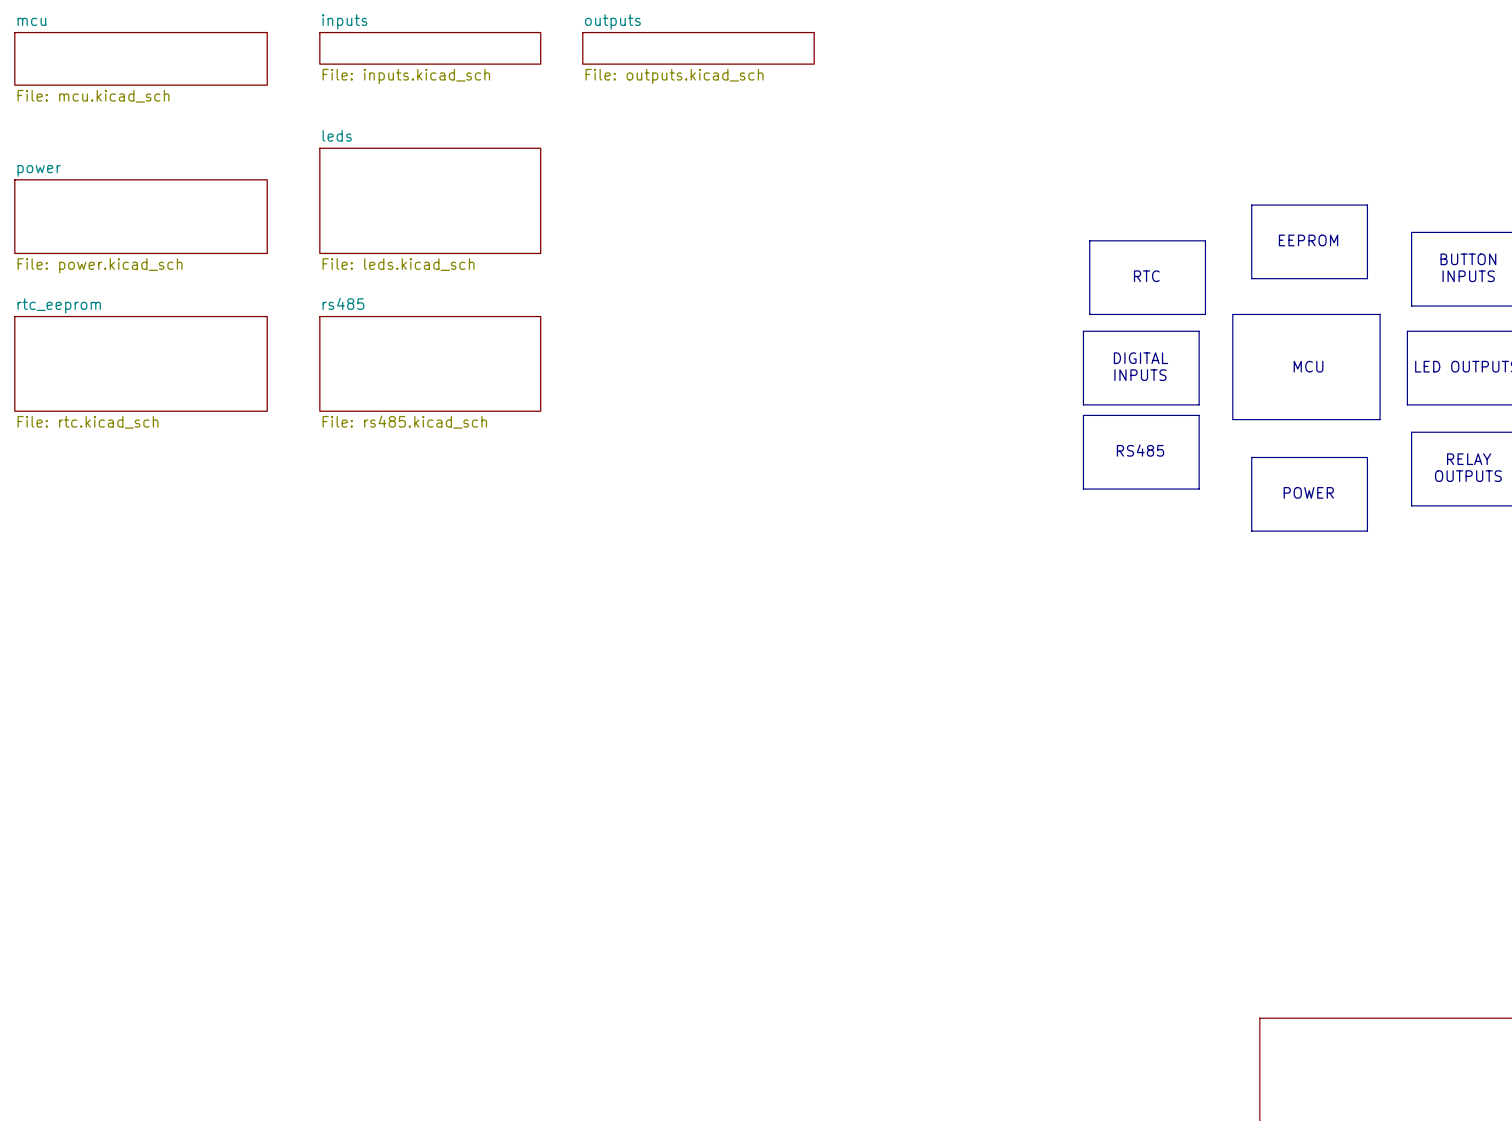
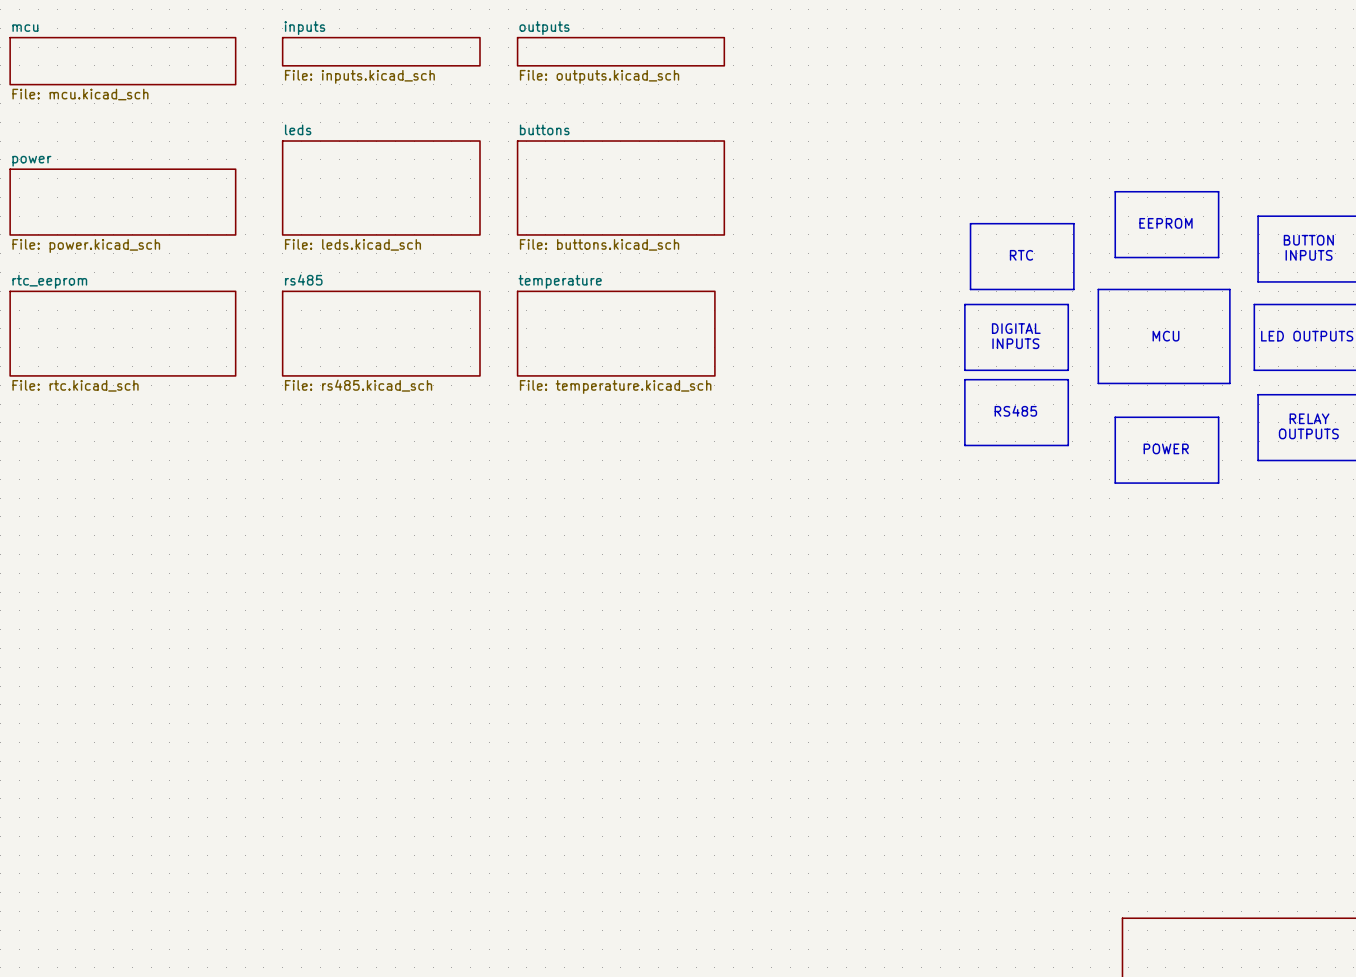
sheet buttons: none -> File: buttons.kicad_sch (620, 187)
sheet temperature: none -> File: temperature.kicad_sch (616, 333)

